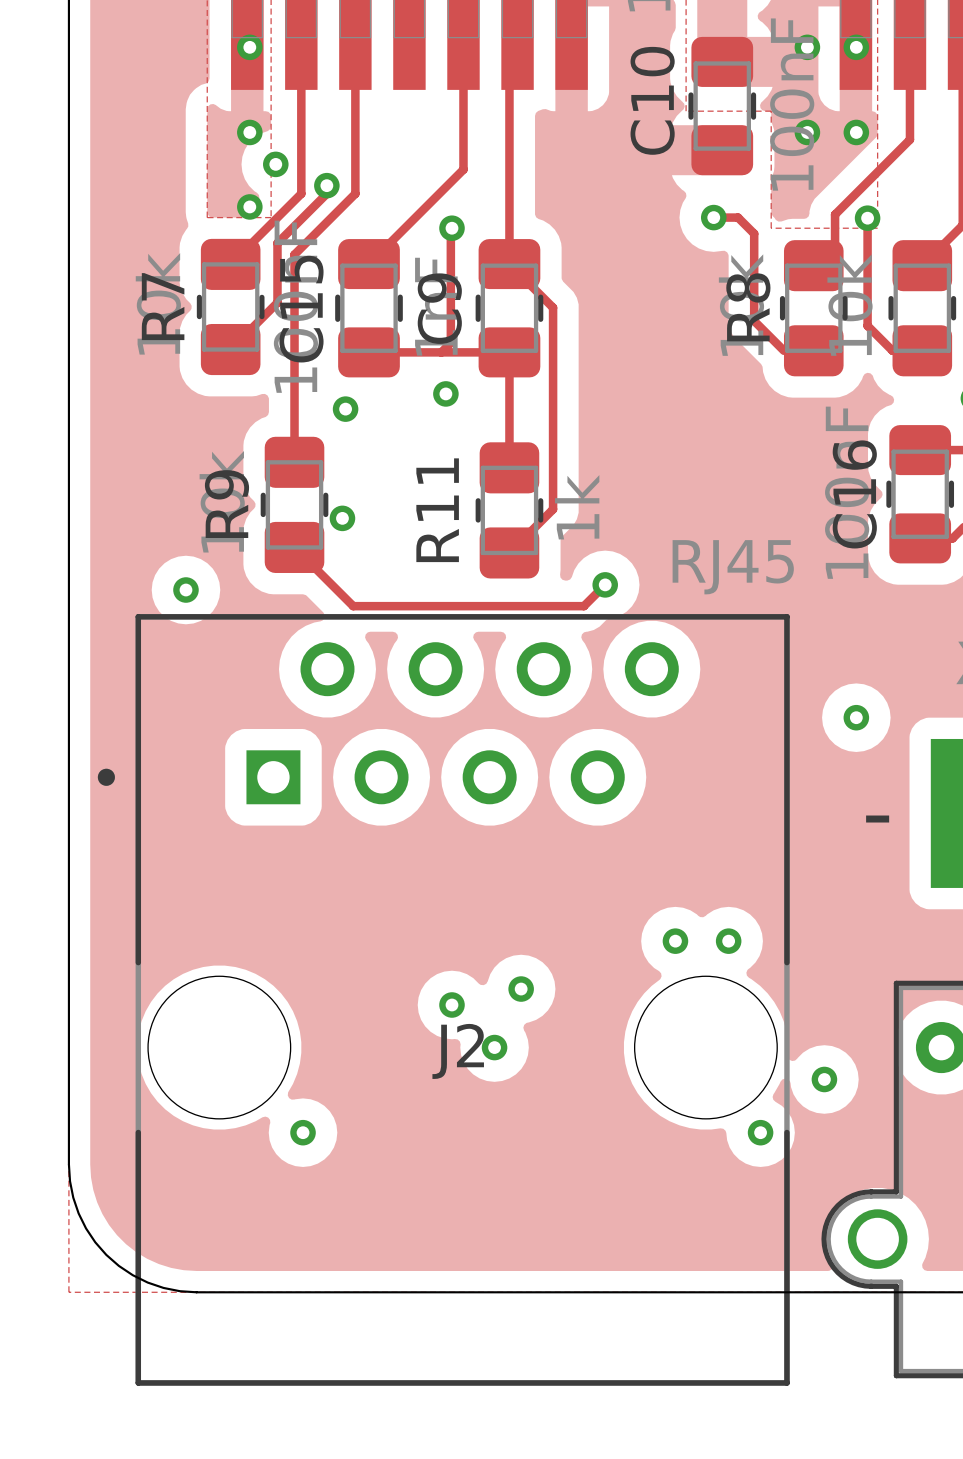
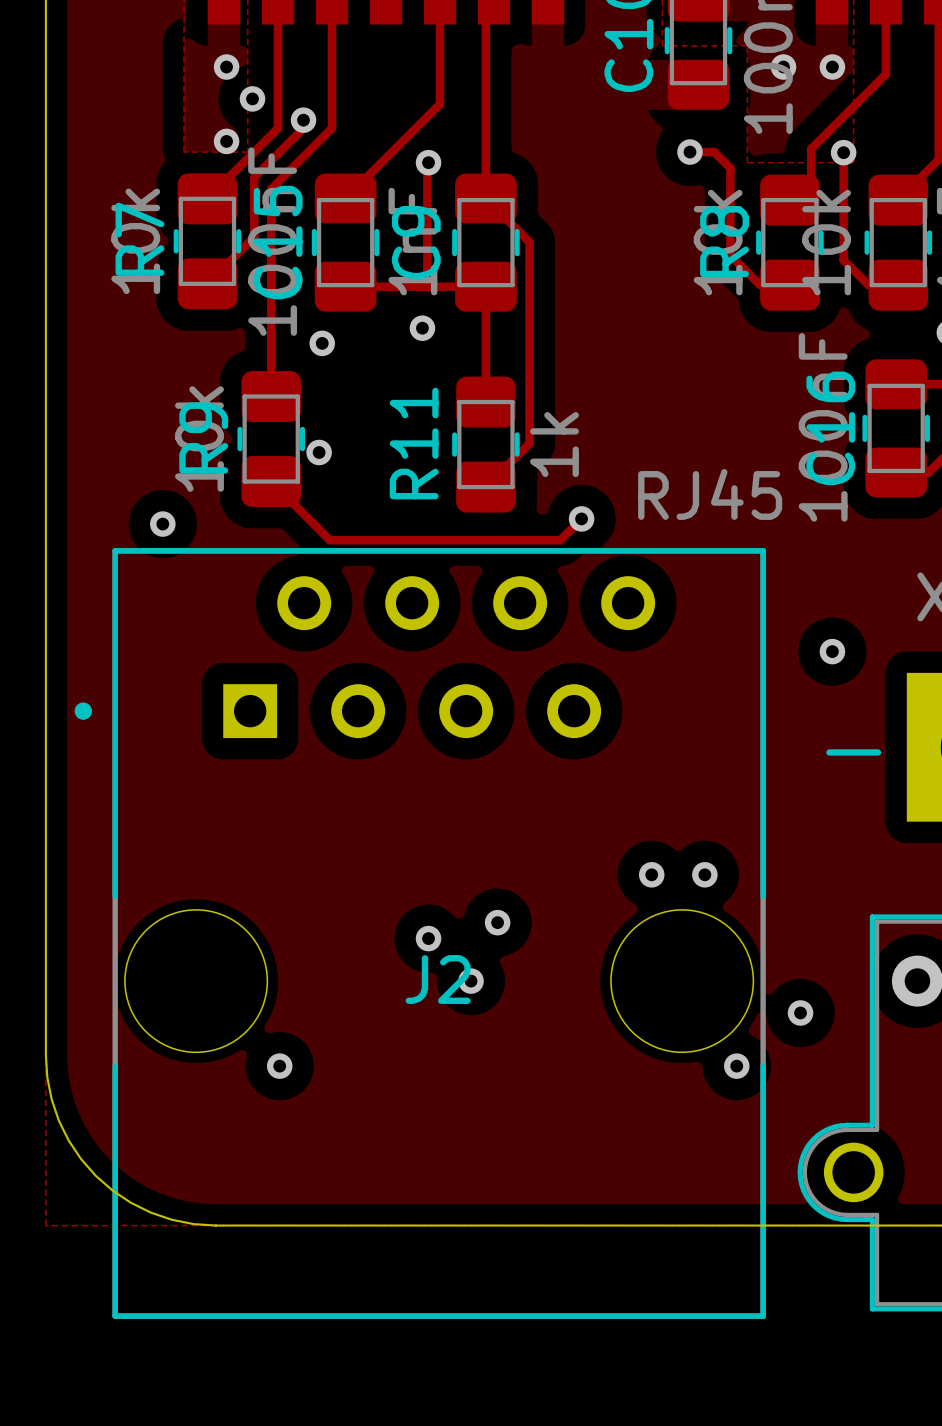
board edge: (68, 1122) (68, 1164) (73, 1197) (86, 1228) (106, 1254) (132, 1275) (163, 1287) (196, 1292) (239, 1292) -> (45, 1055) (47, 1077) (58, 1120) (81, 1159) (95, 1175) (130, 1202) (150, 1212) (193, 1224) (215, 1225)

